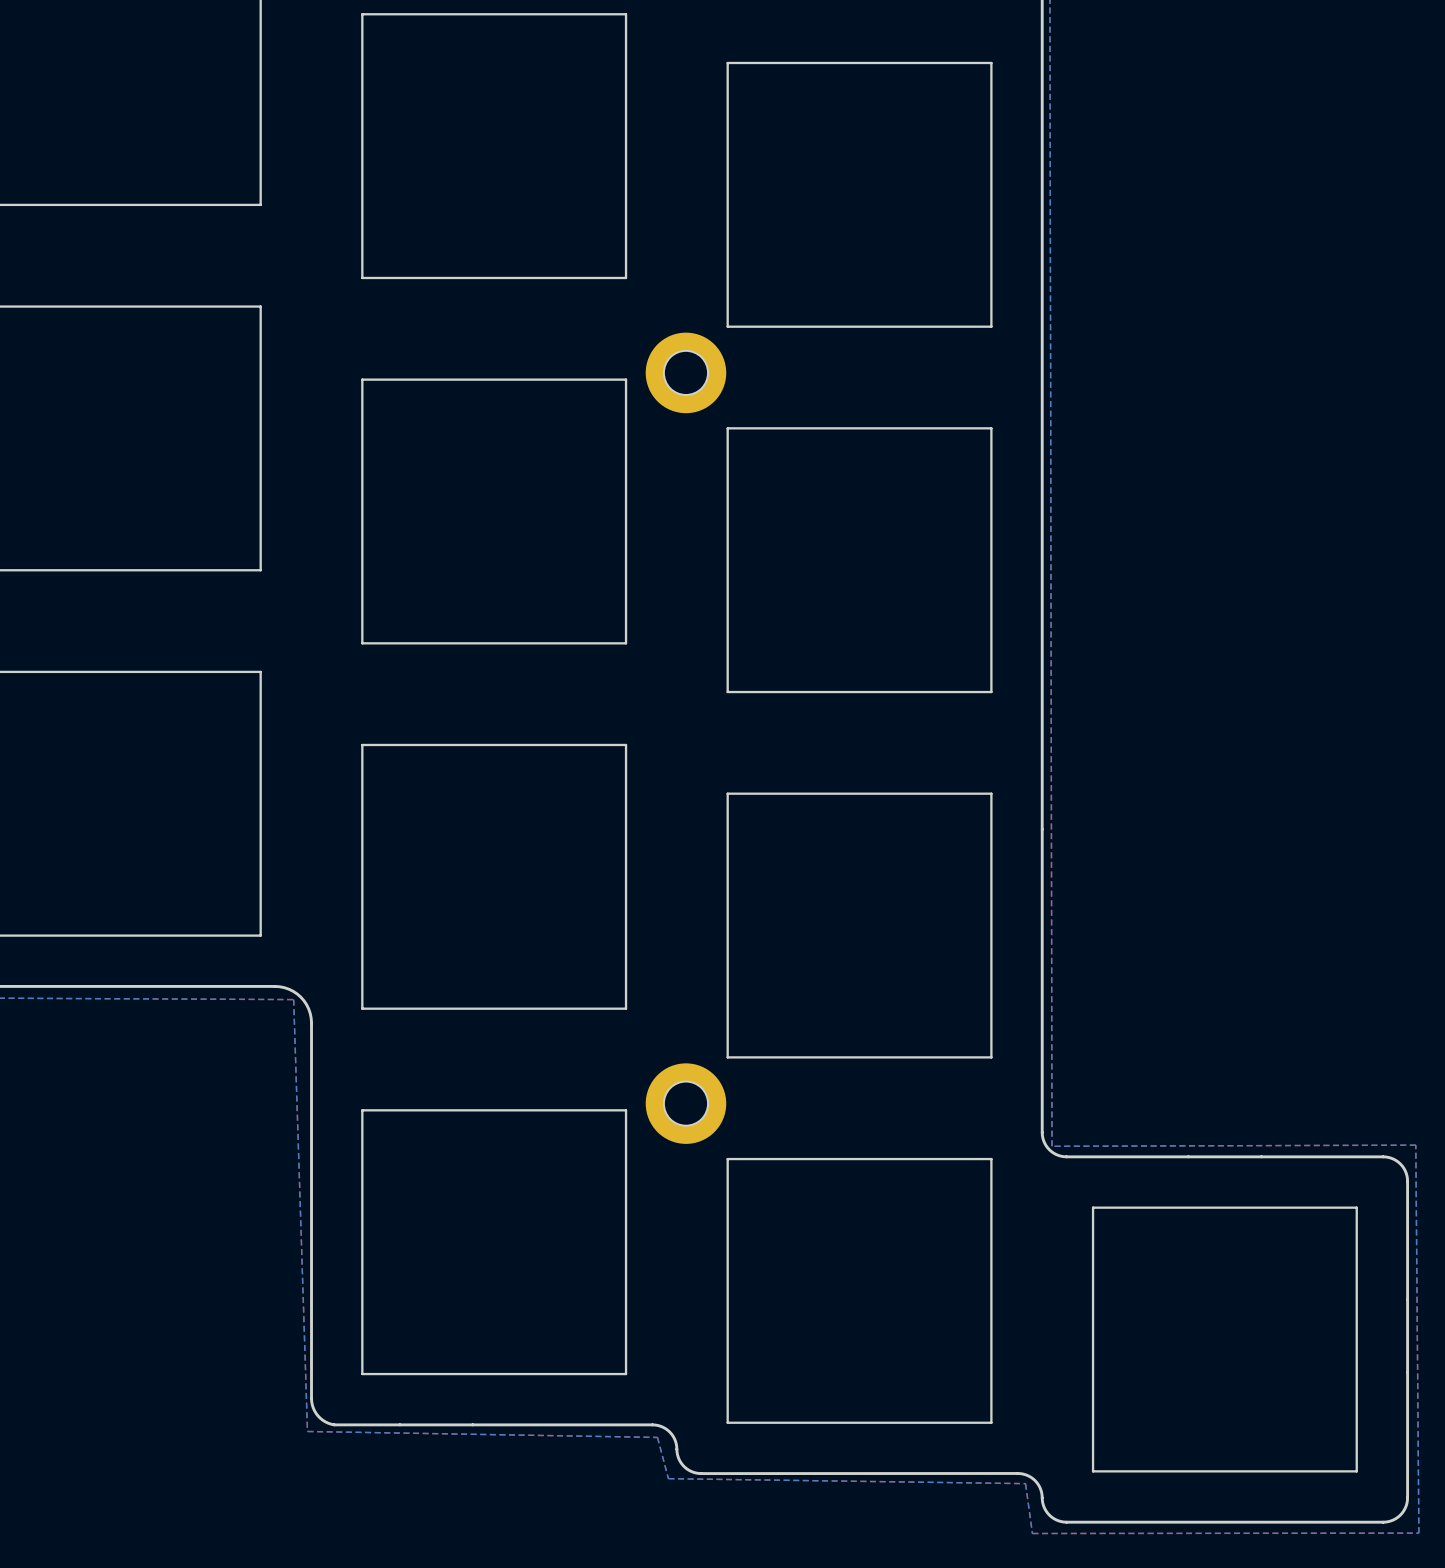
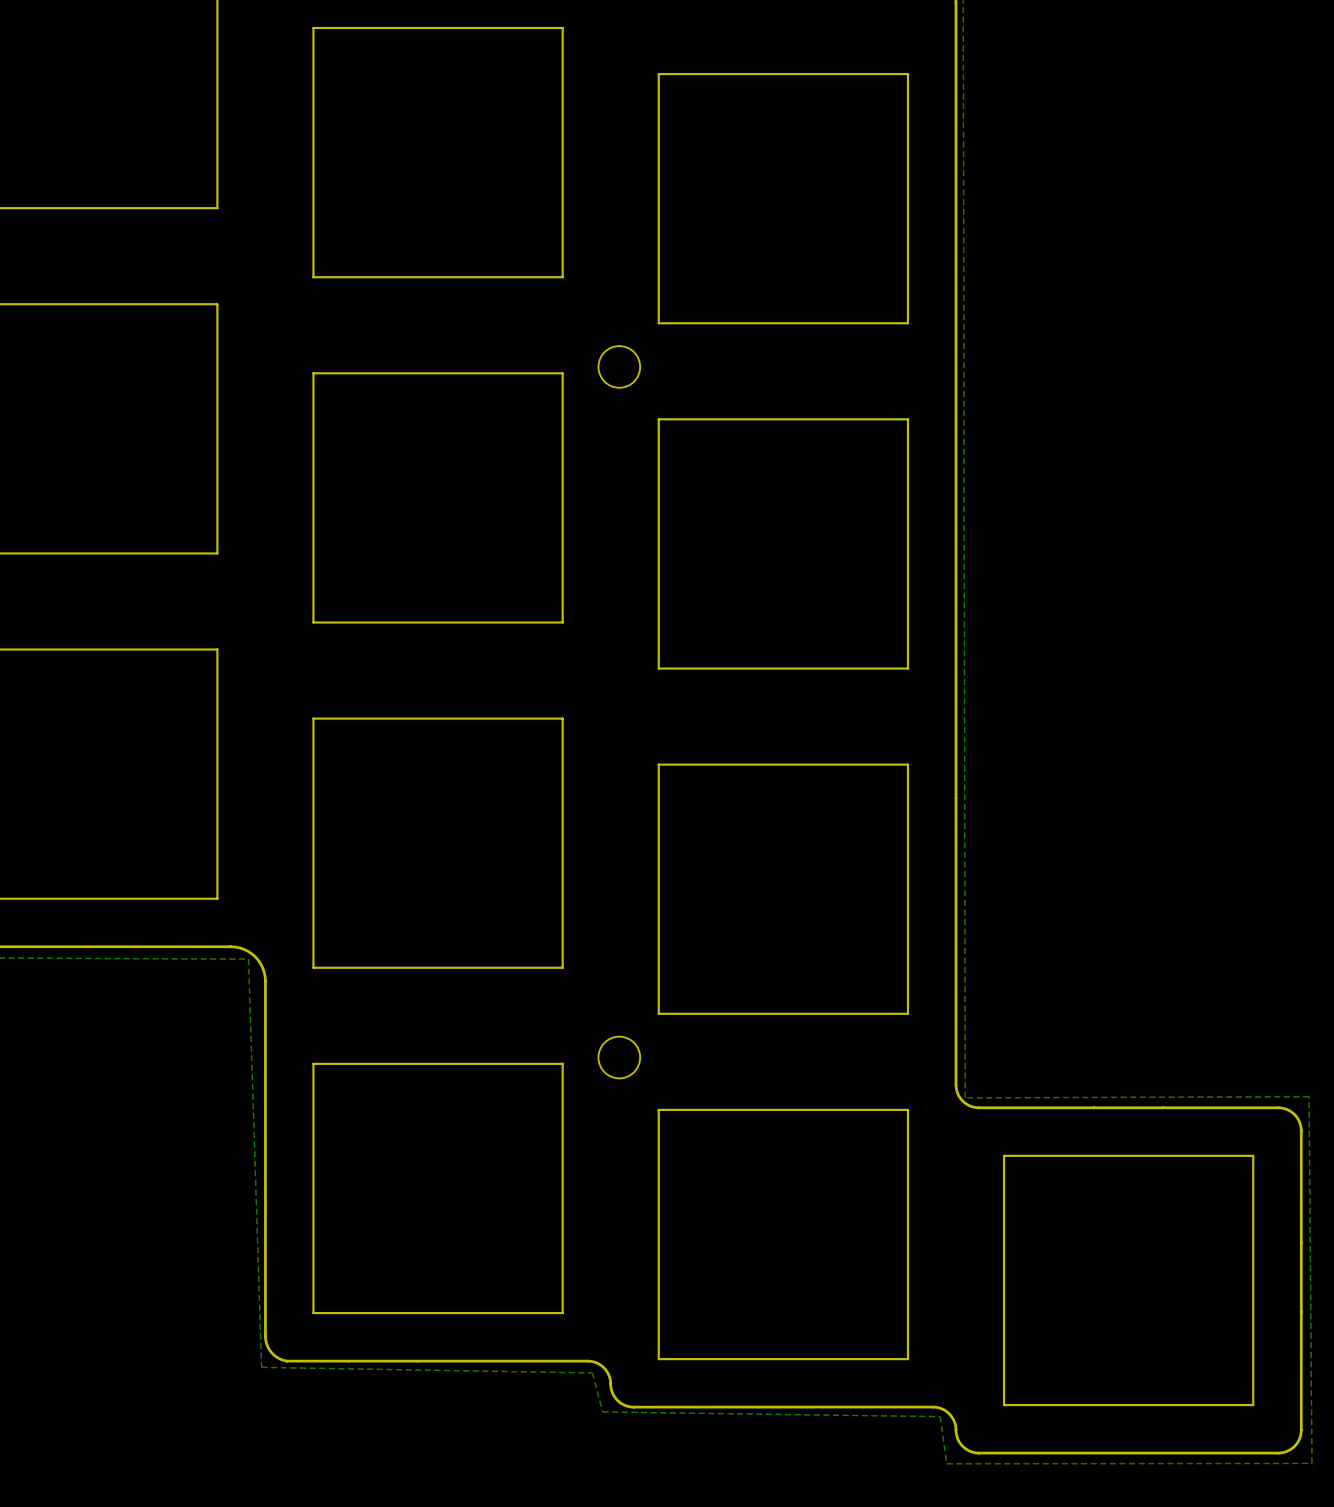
drawing: none -> [597, 345, 642, 389]
part: (685, 372) -> none
drawing: none -> [597, 1035, 642, 1080]
part: (685, 1103) -> none

